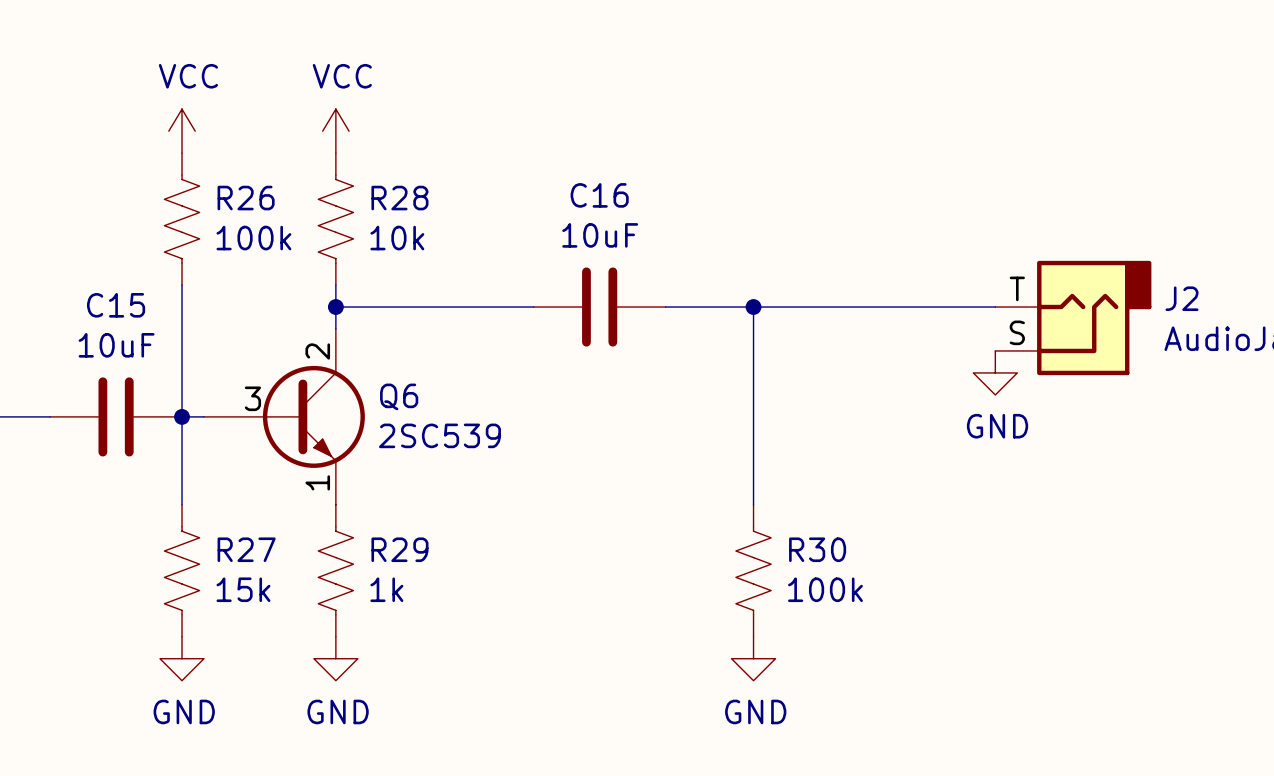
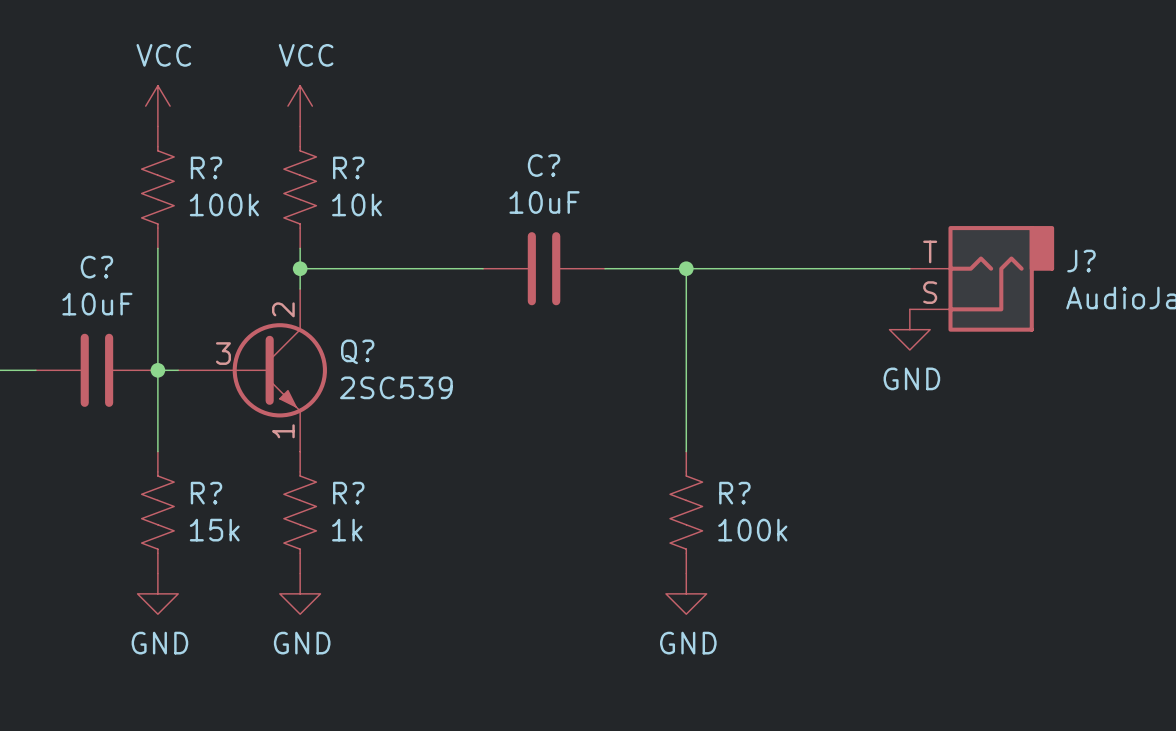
C16 name: C16 (599, 195) -> C? (544, 165)
R26 name: R26 (246, 198) -> R? (206, 167)
R28 name: R28 (399, 198) -> R? (348, 167)
J2 name: J2 (1182, 298) -> J? (1081, 261)
C15 name: C15 (116, 305) -> C? (96, 267)
Q6 name: Q6 (399, 396) -> Q? (357, 351)
R27 name: R27 (246, 549) -> R? (206, 493)
R29 name: R29 (399, 549) -> R? (348, 493)
R30 name: R30 (817, 549) -> R? (734, 493)

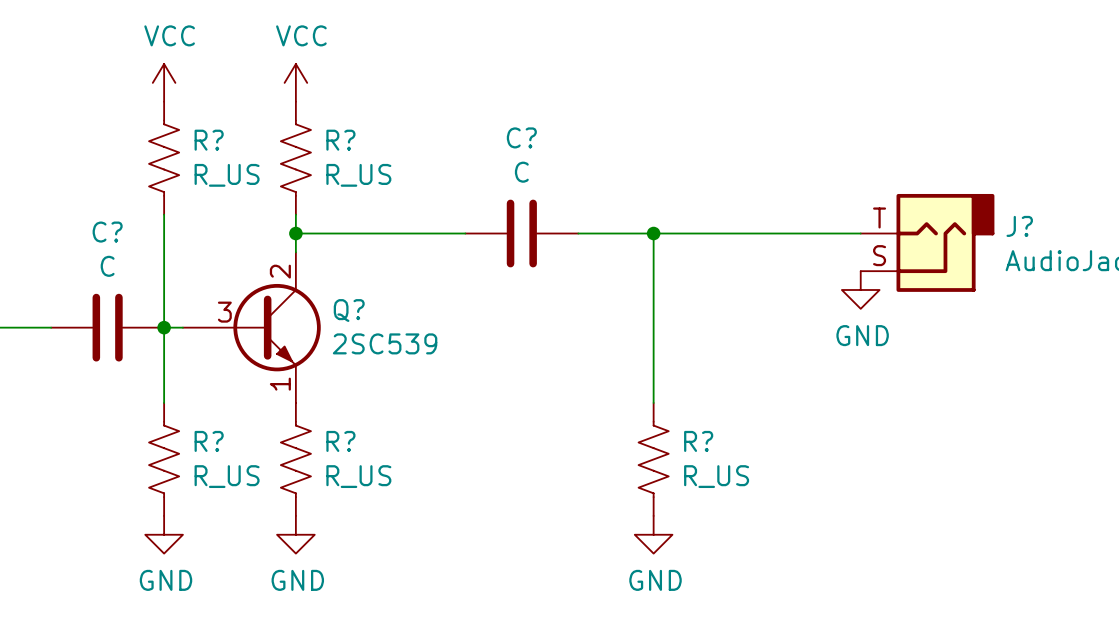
C? value: 10uF (544, 202) -> C (521, 172)
R? value: 100k (224, 204) -> R_US (227, 175)
R? value: 10k (356, 204) -> R_US (358, 175)
C? value: 10uF (97, 304) -> C (107, 266)
R? value: 15k (214, 530) -> R_US (227, 476)
R? value: 1k (347, 530) -> R_US (358, 476)
R? value: 100k (752, 530) -> R_US (716, 476)

